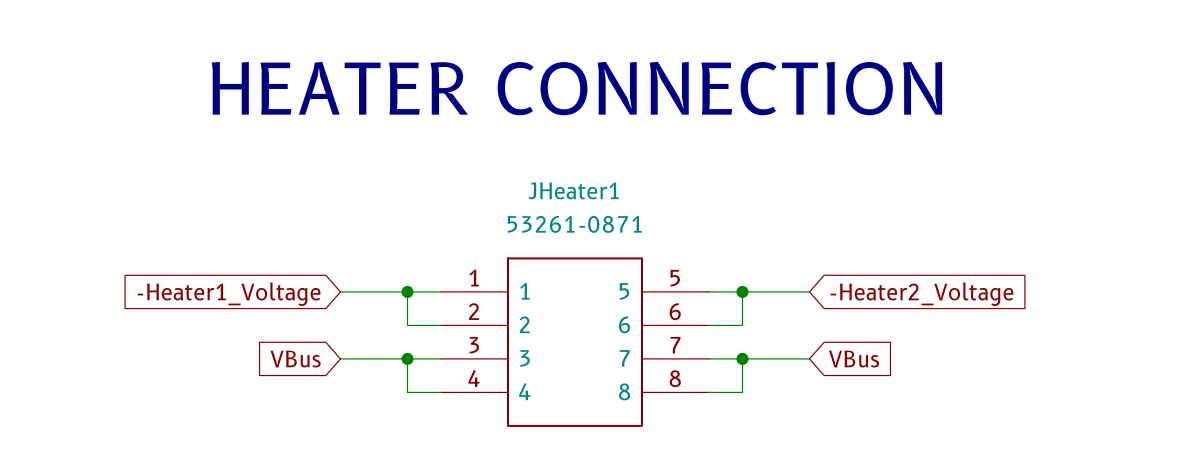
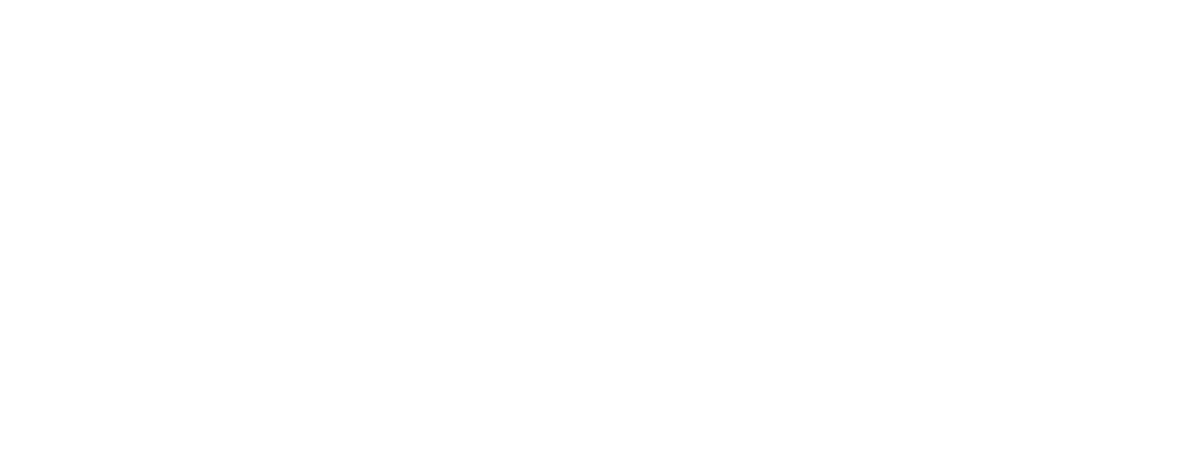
text: HEATER CONNECTION (576, 88) -> none
wire: (340, 291) (441, 291) -> none
wire: (407, 291) (407, 325) (441, 325) -> none
junction: (407, 291) -> none
wire: (709, 291) (809, 291) -> none
wire: (742, 291) (742, 325) (709, 325) -> none
junction: (742, 291) -> none
global label: -Heater1_Voltage (229, 294) -> none
global label: -Heater2_Voltage (921, 294) -> none
JHeater1: 53261-0871 (575, 342) -> none
wire: (340, 358) (441, 358) -> none
wire: (407, 358) (407, 392) (441, 392) -> none
junction: (407, 358) -> none
wire: (709, 358) (809, 358) -> none
wire: (742, 358) (742, 392) (709, 392) -> none
junction: (742, 358) -> none
global label: VBus (295, 359) -> none
global label: VBus (854, 359) -> none

